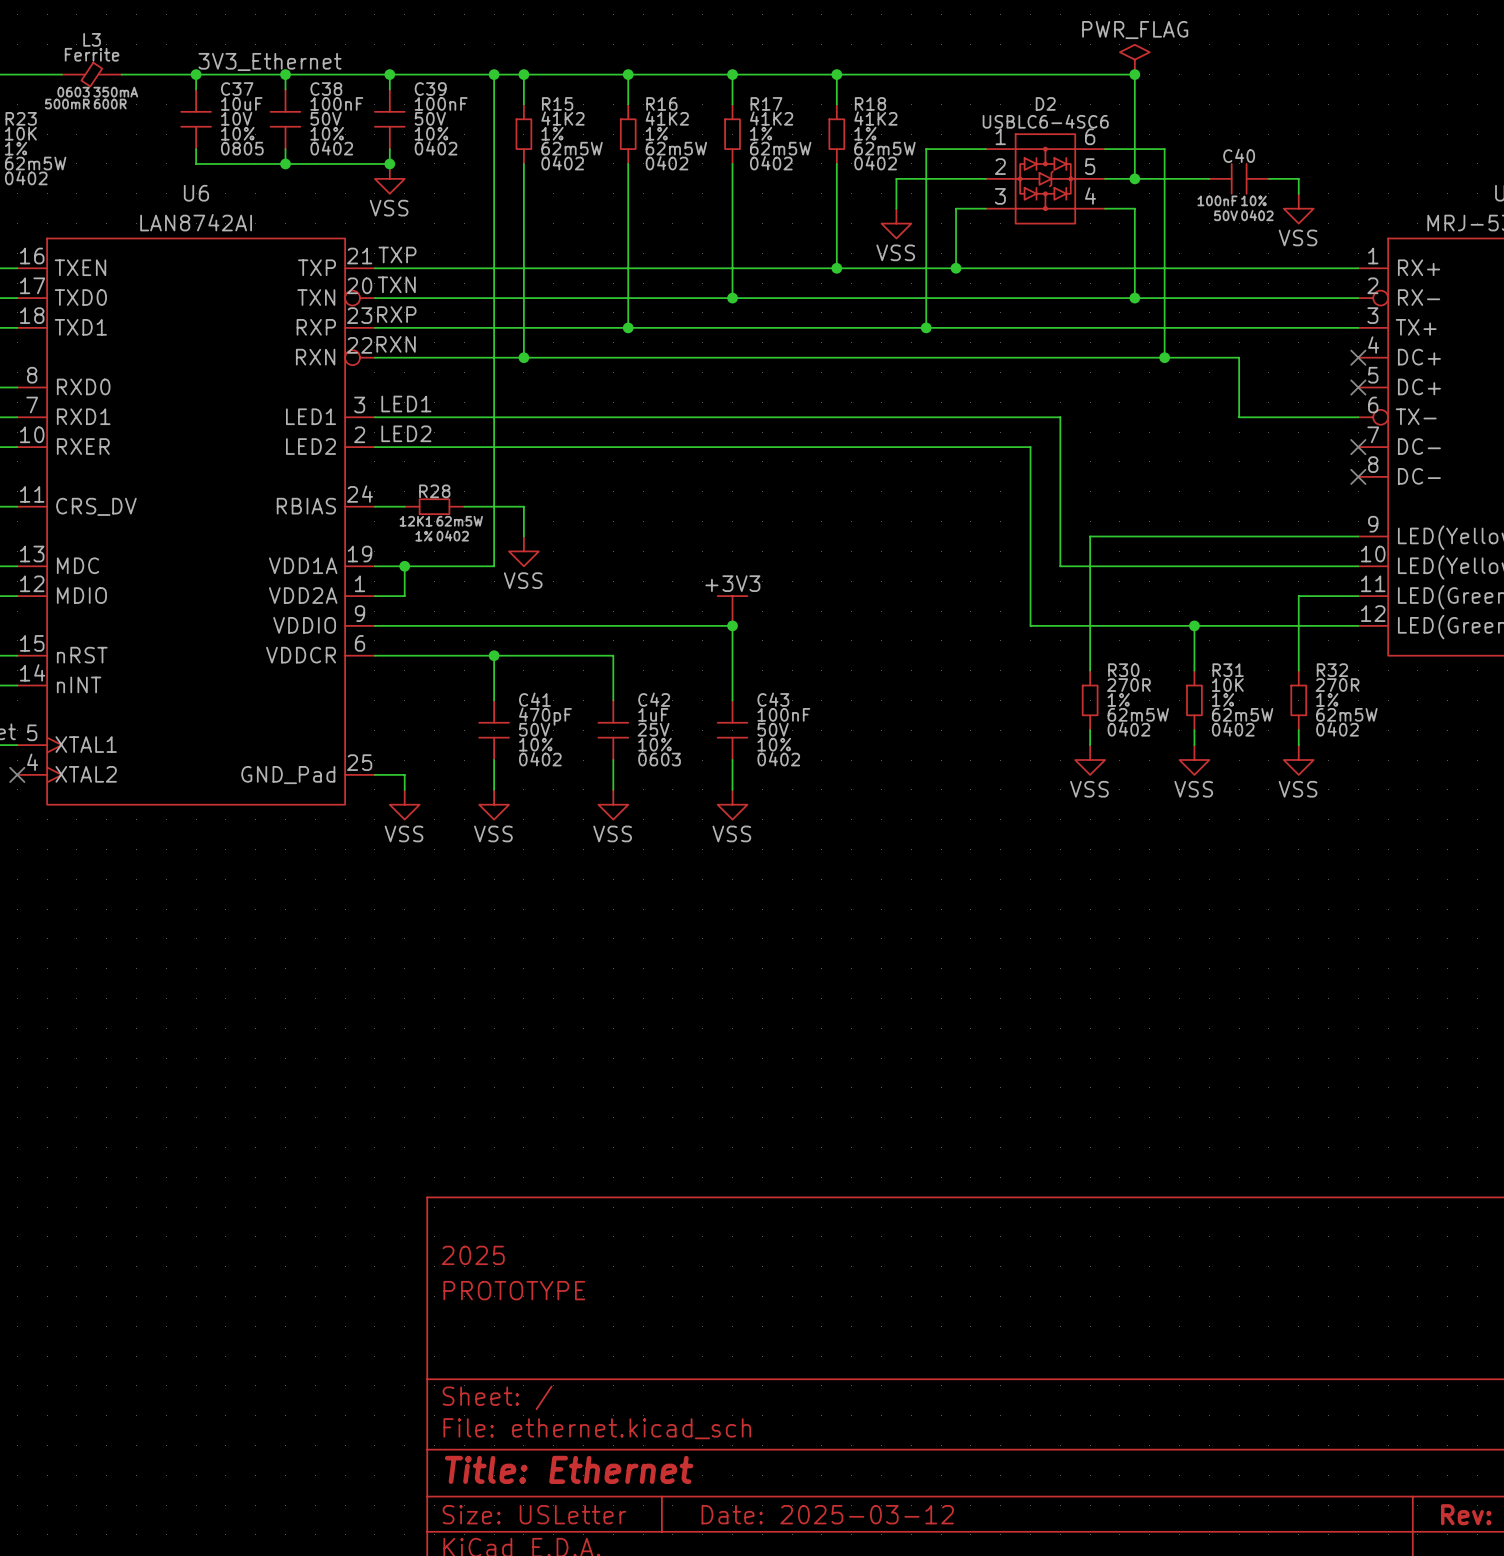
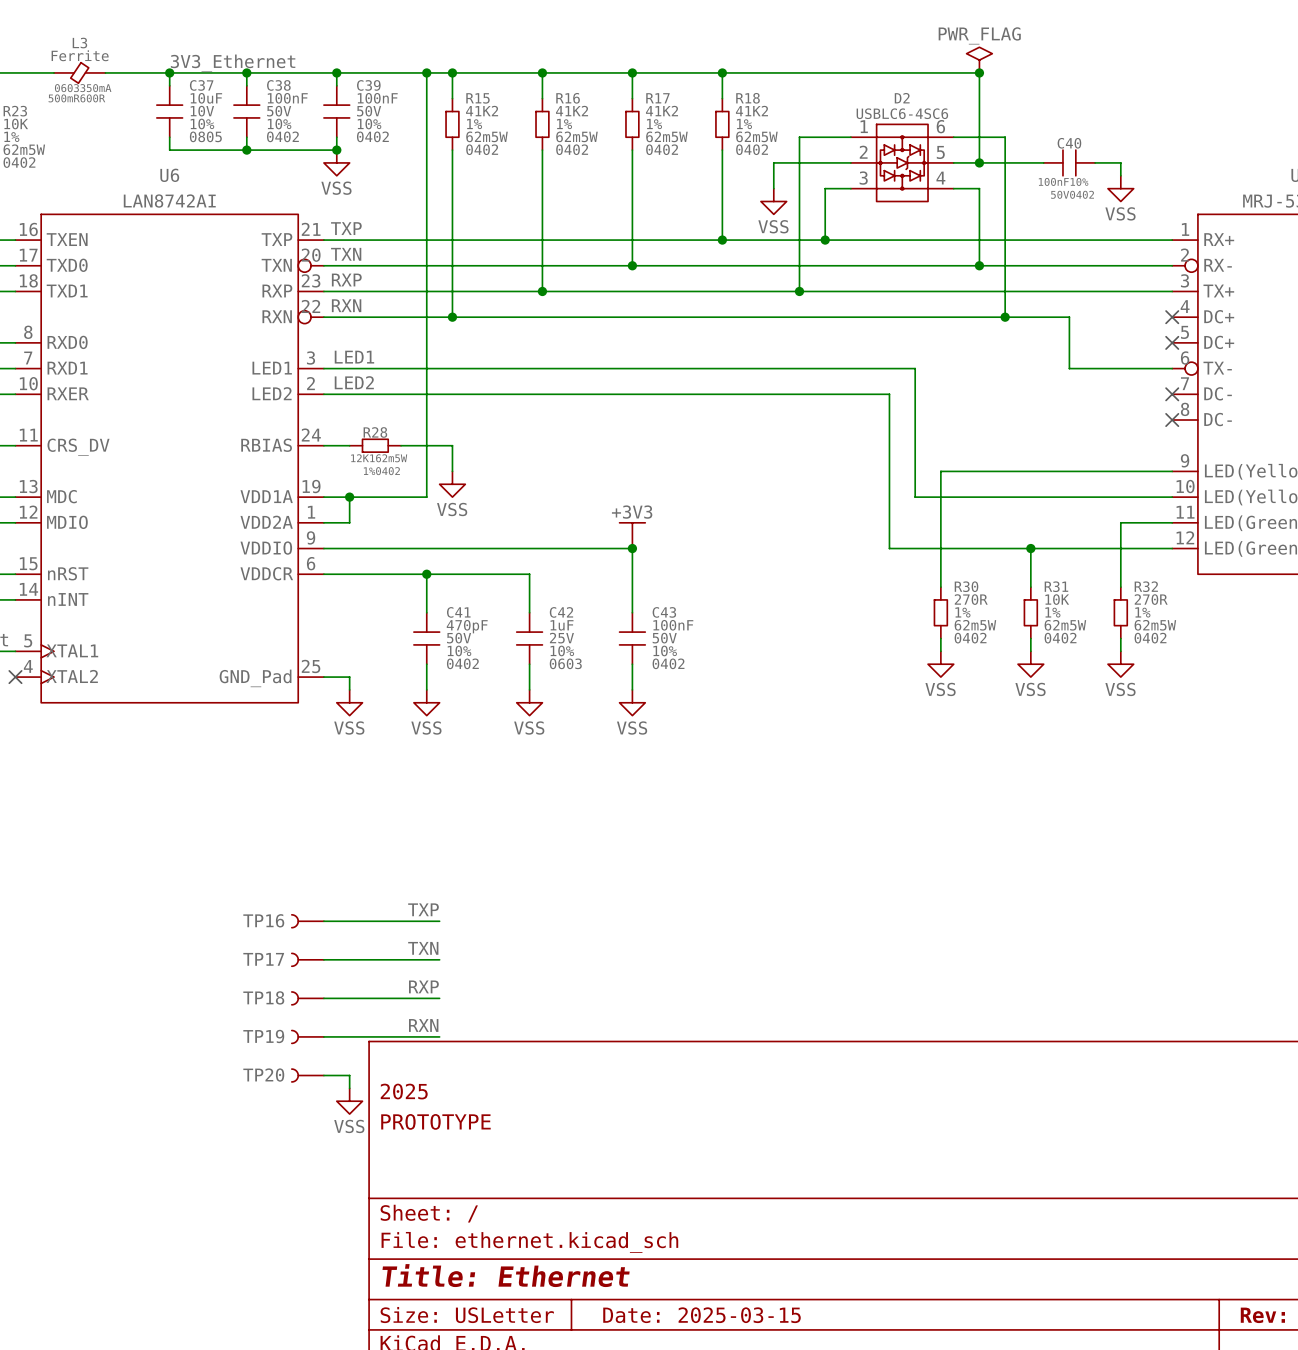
label: none -> TXP (423, 909)
TP16: none -> (307, 921)
wire: none -> (323, 921) (439, 921)
label: none -> TXN (423, 948)
TP17: none -> (307, 959)
wire: none -> (323, 959) (439, 959)
label: none -> RXP (423, 986)
TP18: none -> (307, 998)
wire: none -> (323, 998) (439, 998)
label: none -> RXN (423, 1025)
TP19: none -> (307, 1036)
wire: none -> (323, 1036) (439, 1036)
TP20: none -> (307, 1075)
wire: none -> (323, 1075) (349, 1075) (349, 1088)
power symbol: none -> VSS (349, 1101)
title block: Date: 2025-03-12 (827, 1514) -> Date: 2025-03-15 (701, 1315)

